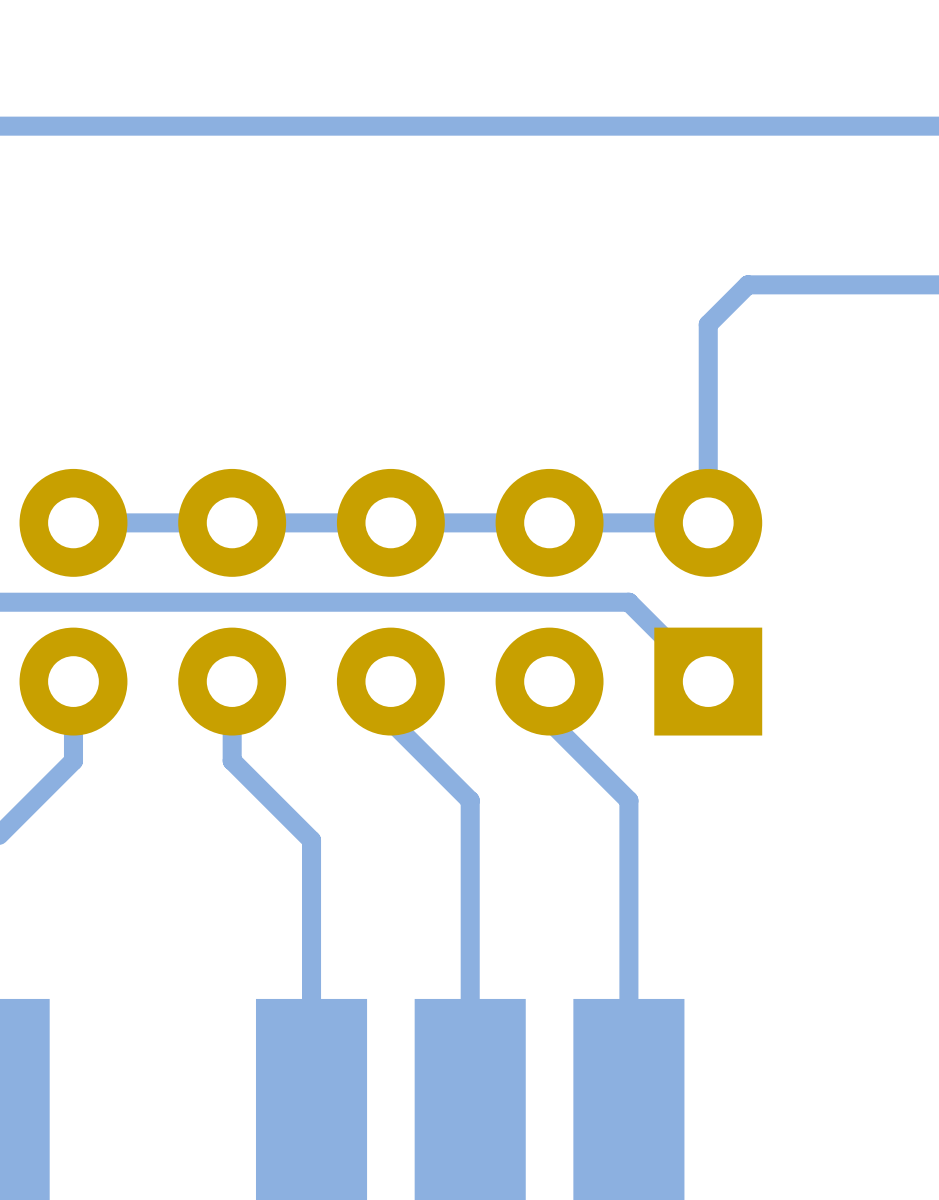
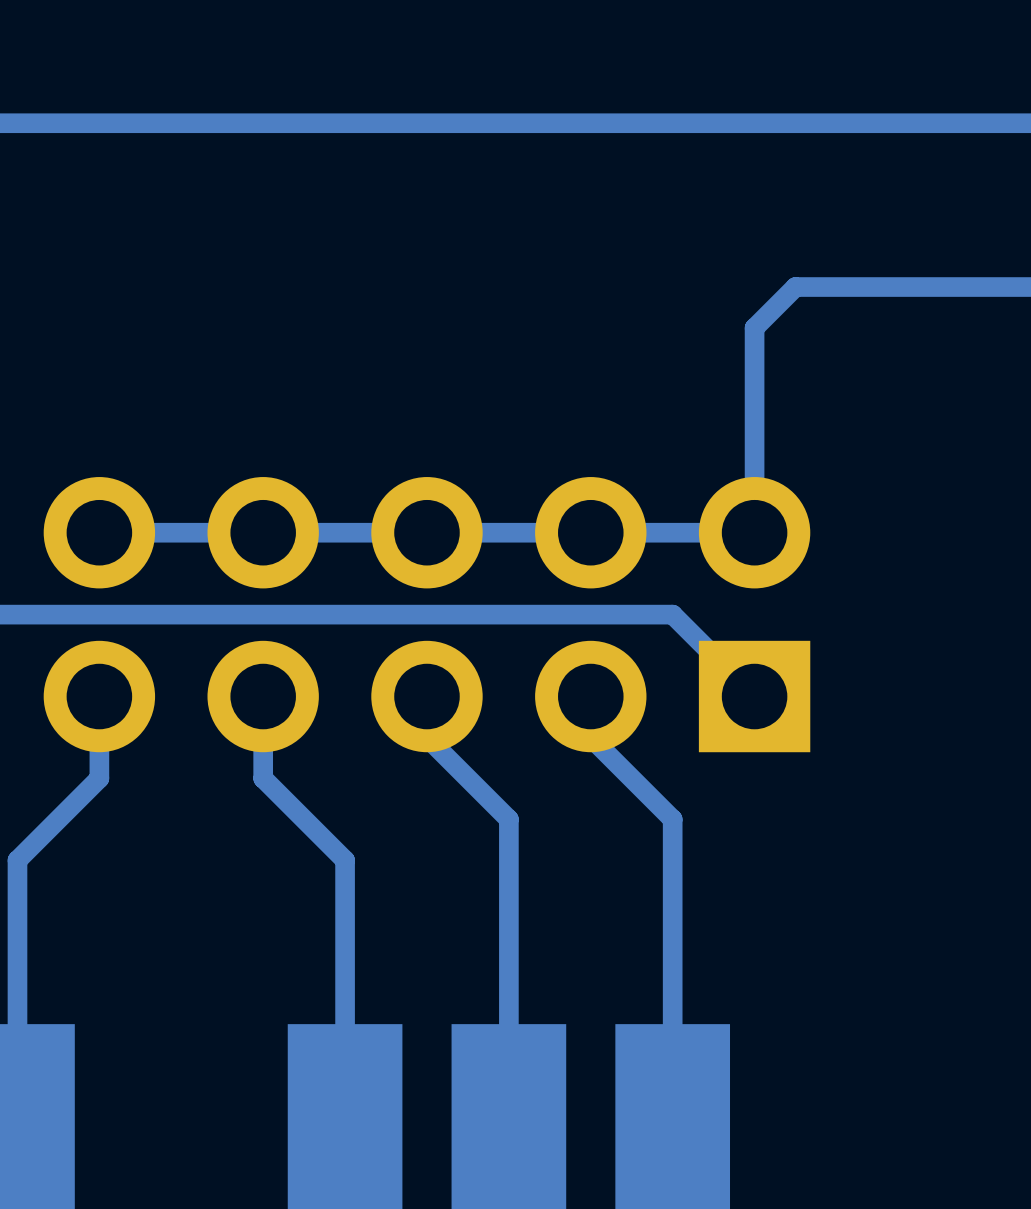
part footprint: [19, 468, 763, 736] -> [43, 477, 811, 753]

